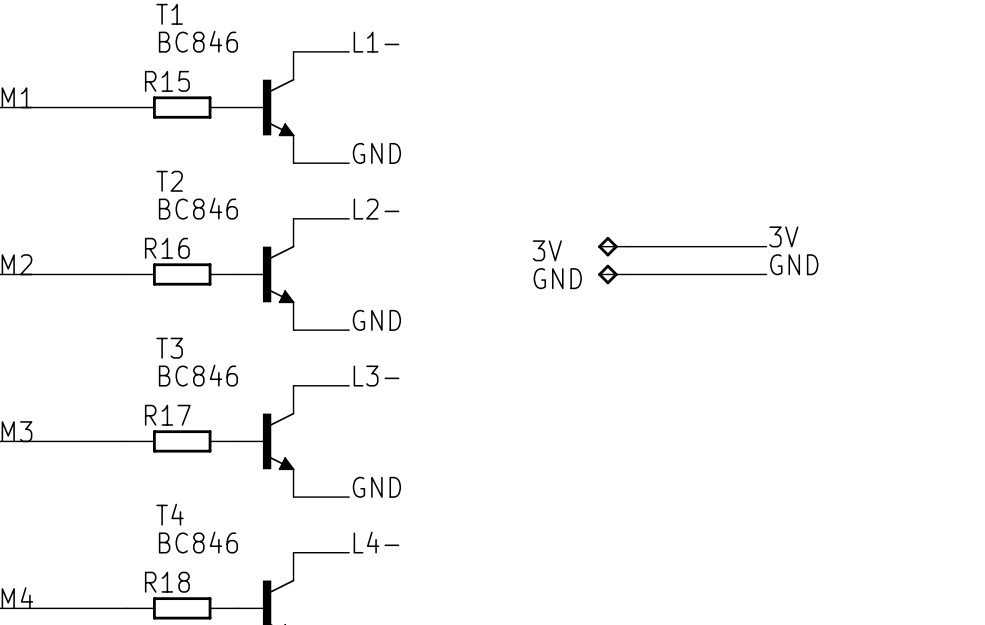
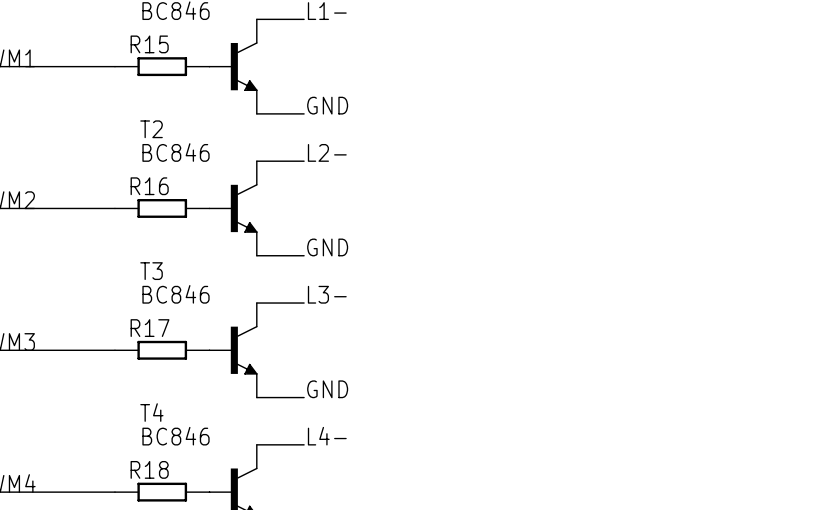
label: 3V (783, 236) -> none
3V: (612, 246) -> none
wire: (627, 246) (766, 246) -> none
label: GND (794, 264) -> none
GND: (612, 274) -> none
wire: (627, 274) (766, 274) -> none

